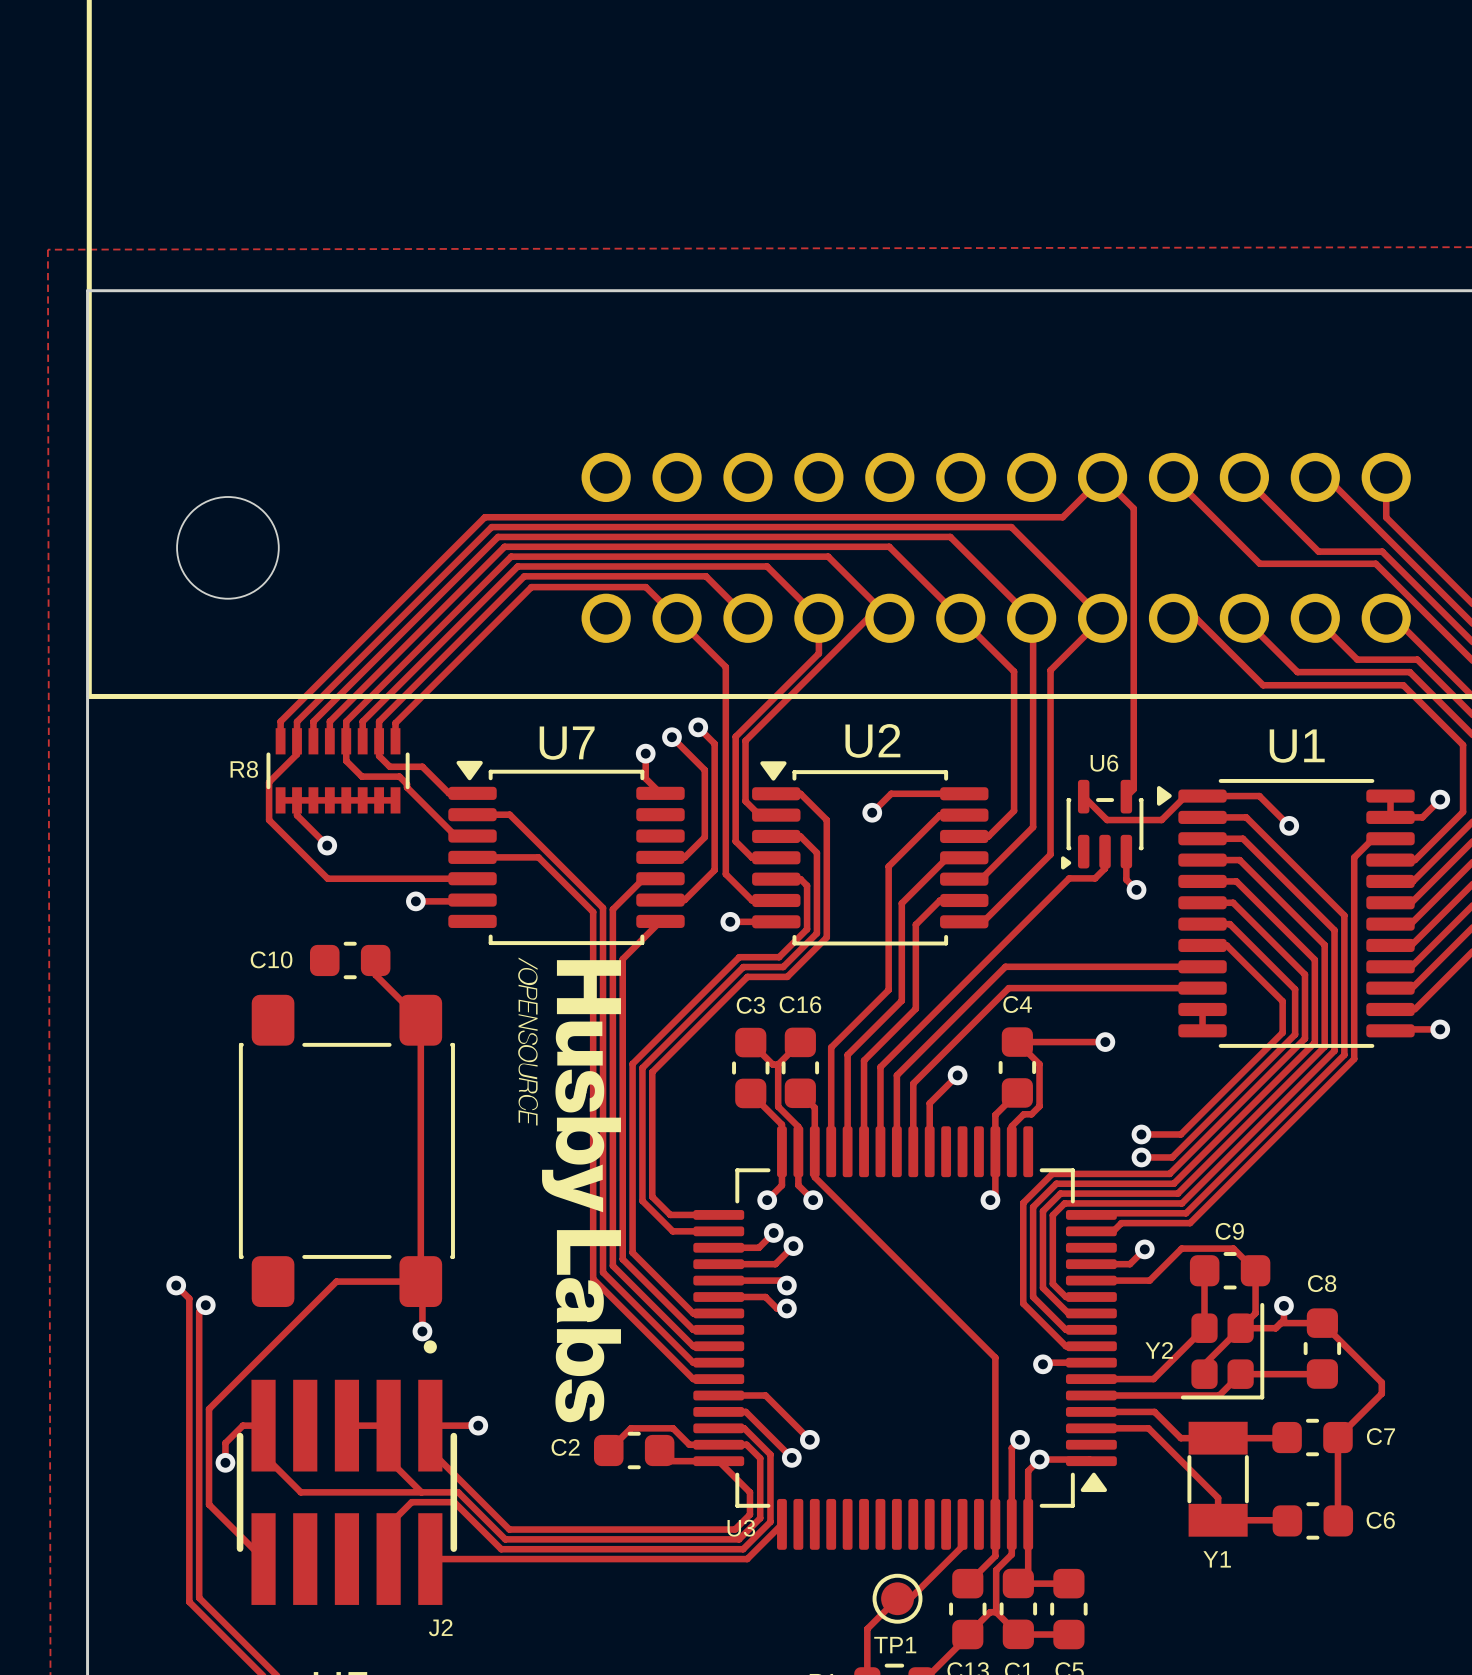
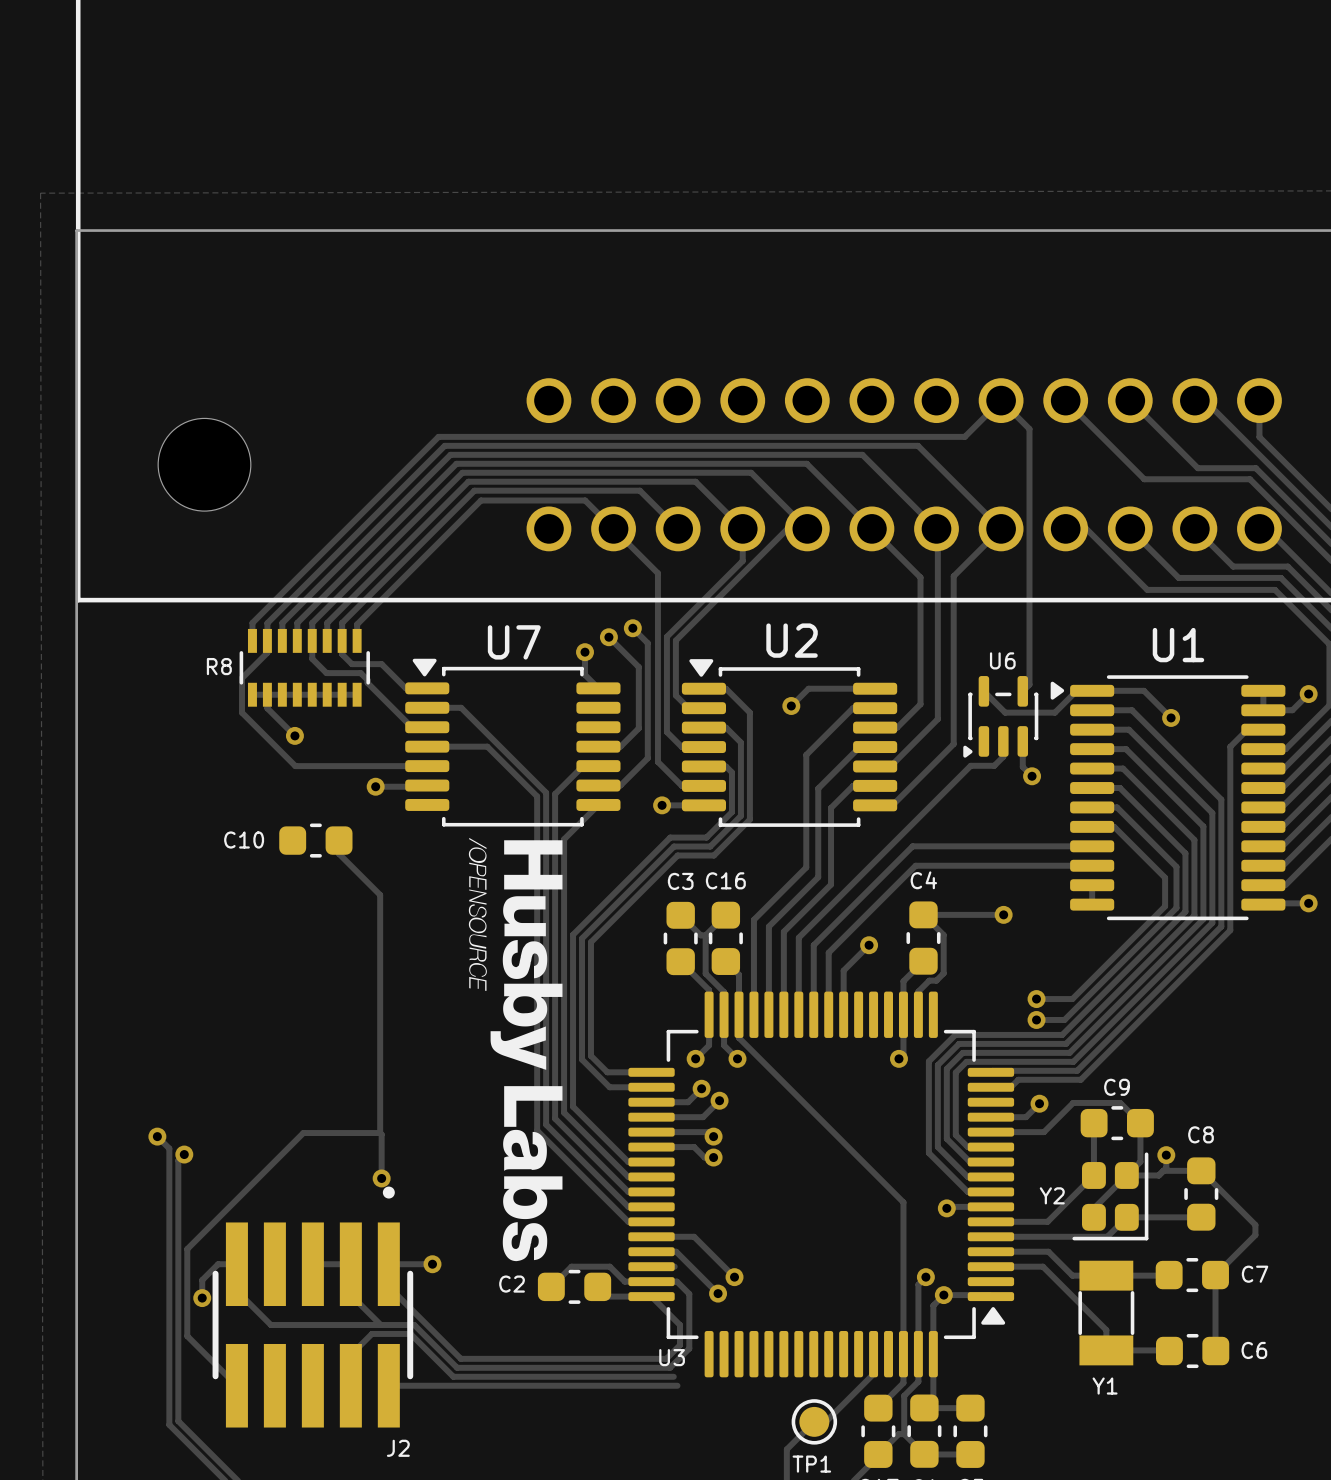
part: (346, 1150) -> none
track: (744, 1428) (770, 1454) (770, 1521) (743, 1549) -> none
track: (781, 1524) (747, 1559) -> none

